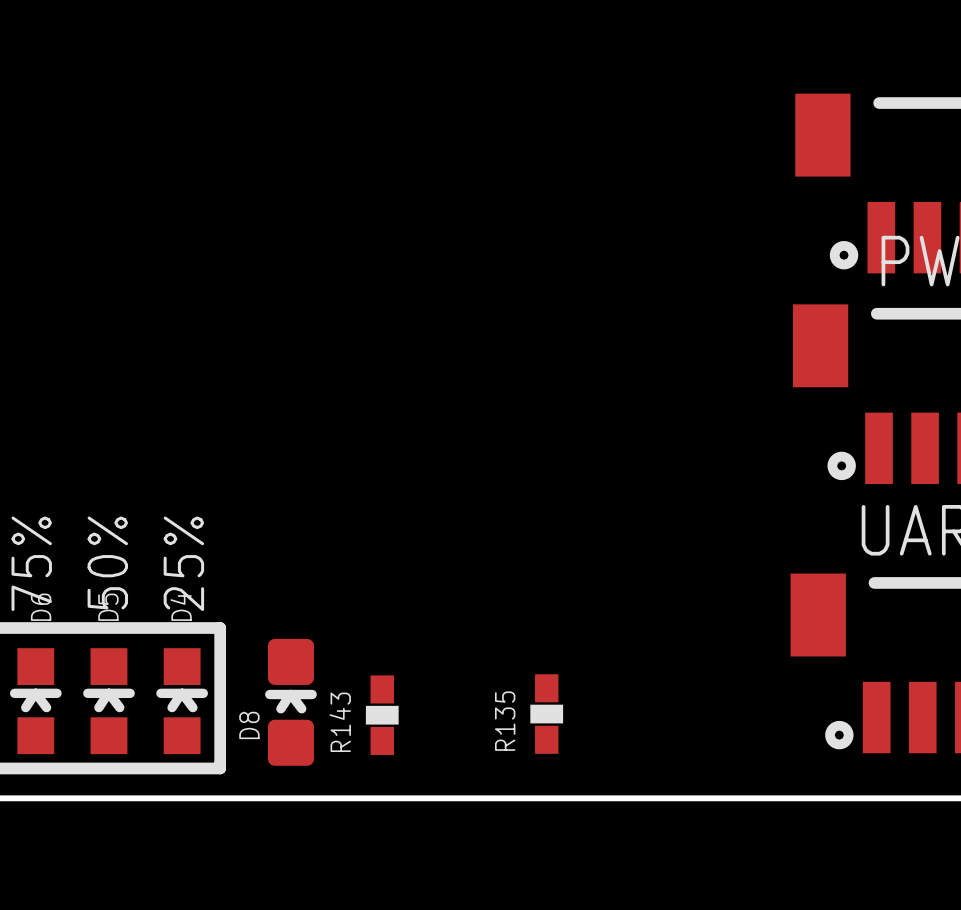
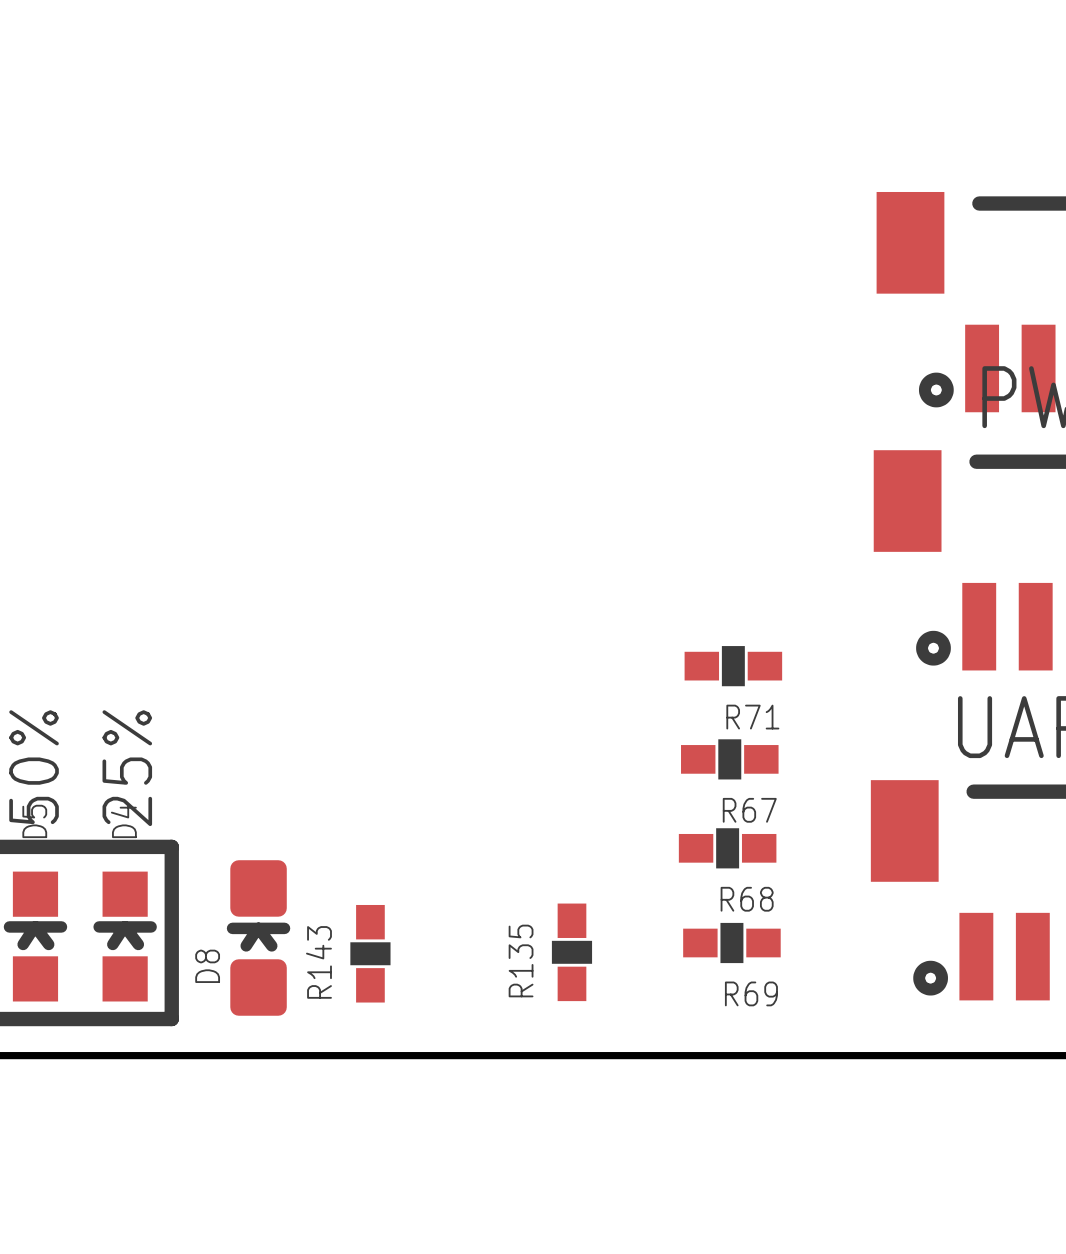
R71: none -> (733, 666)
R67: none -> (729, 759)
R68: none -> (727, 848)
R69: none -> (731, 943)

